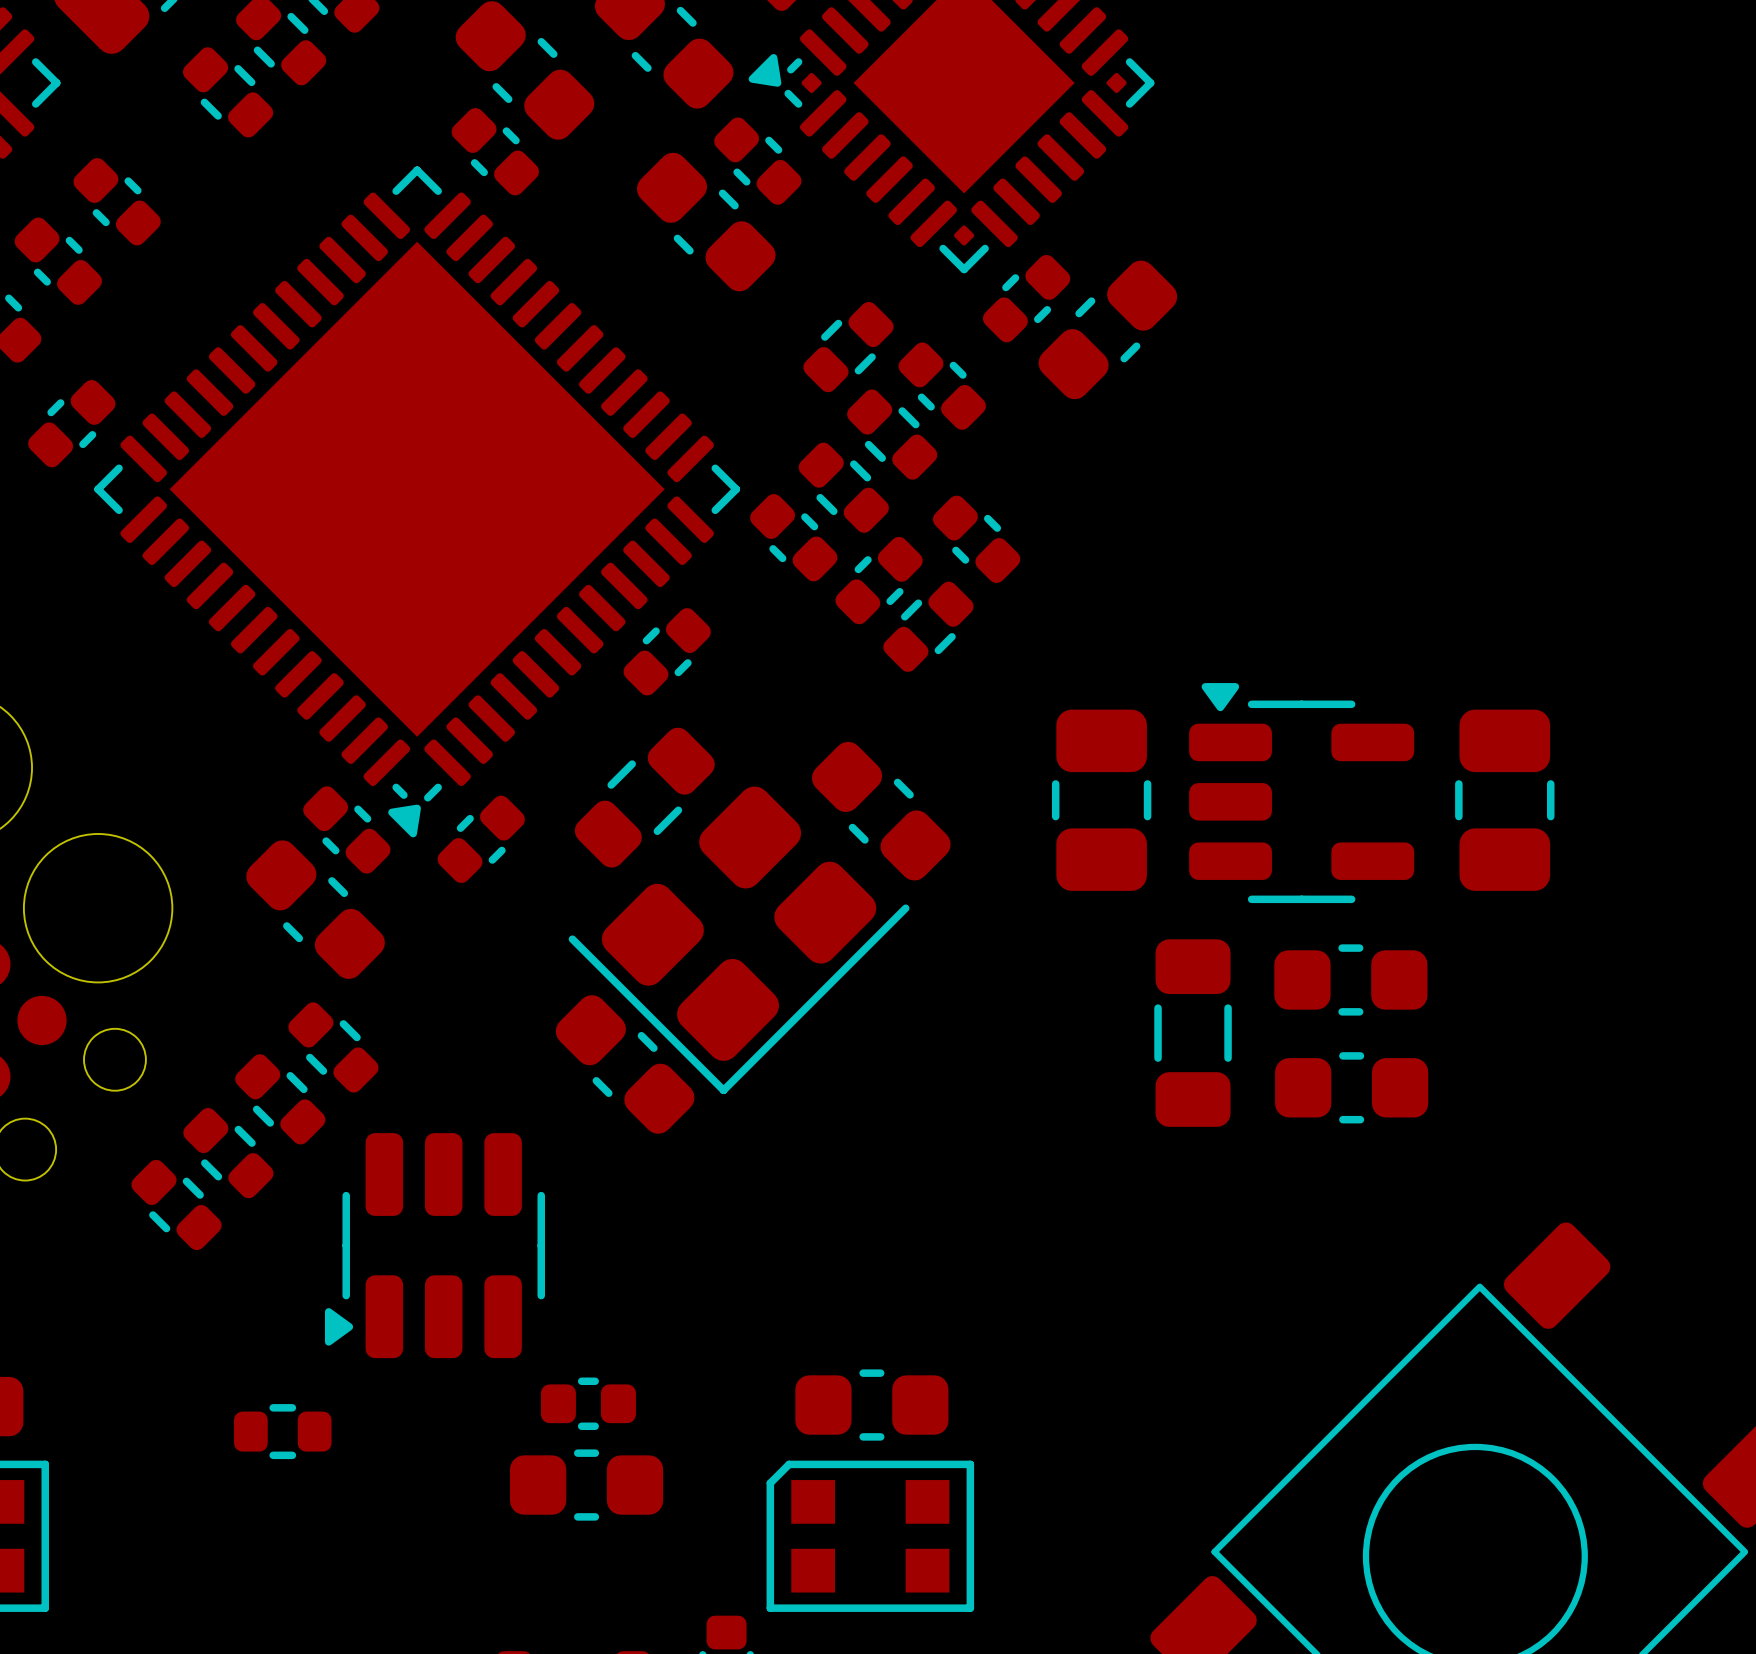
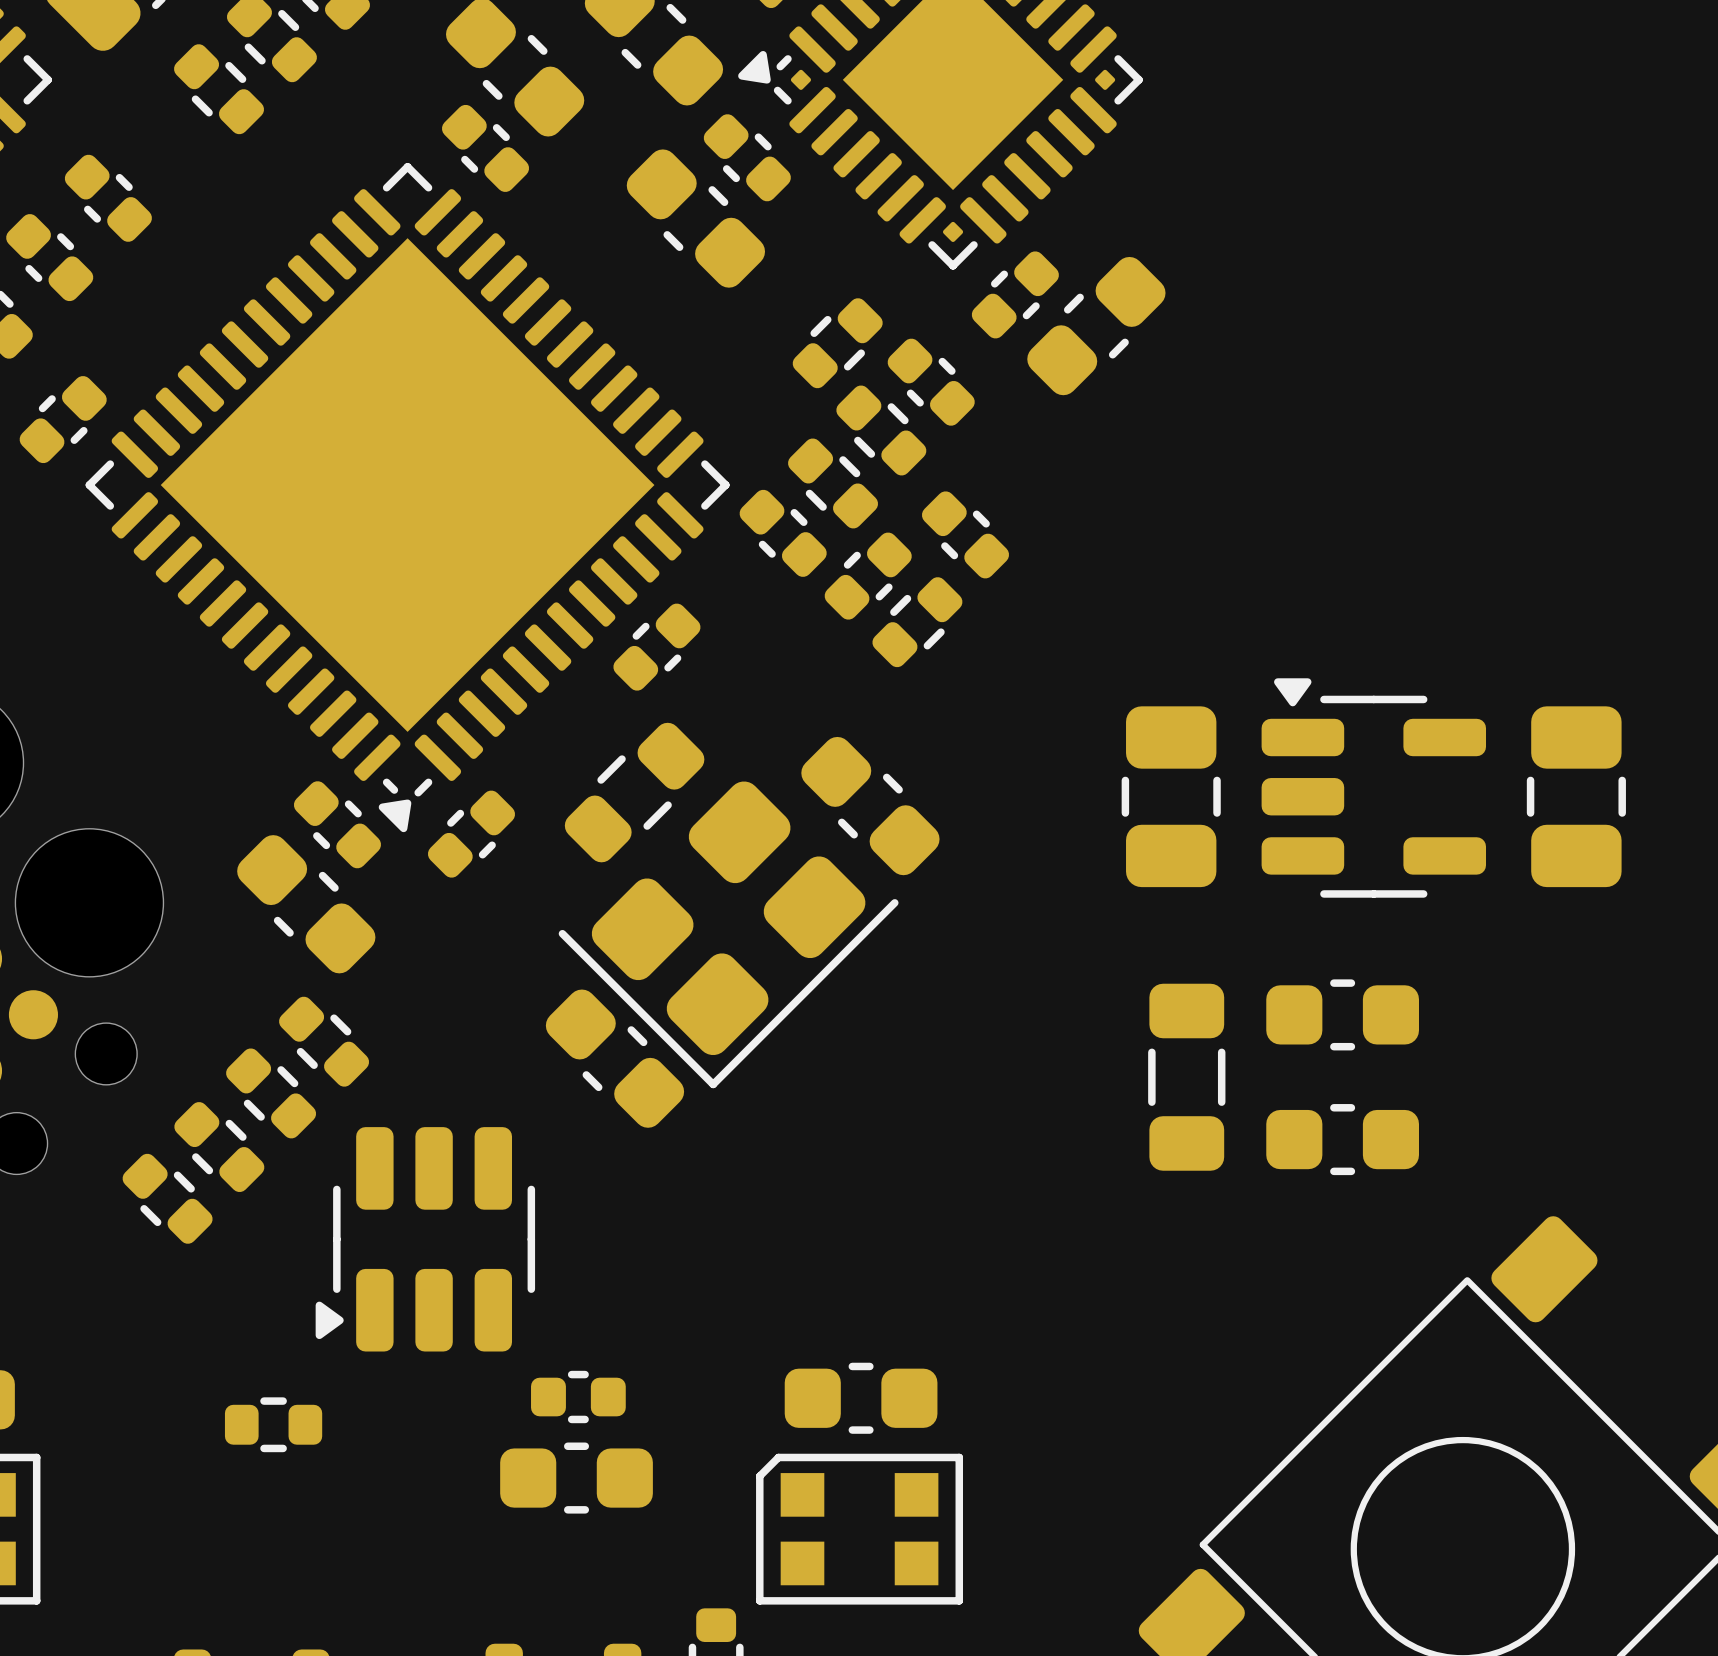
part position: (1301, 793) -> (1373, 787)
part position: (1101, 800) -> (1171, 796)
part position: (1504, 800) -> (1576, 796)
part: (1350, 979) -> none
part: none -> (1342, 1014)
part position: (1193, 1033) -> (1186, 1077)
part: (1351, 1087) -> none
part: none -> (1342, 1139)

